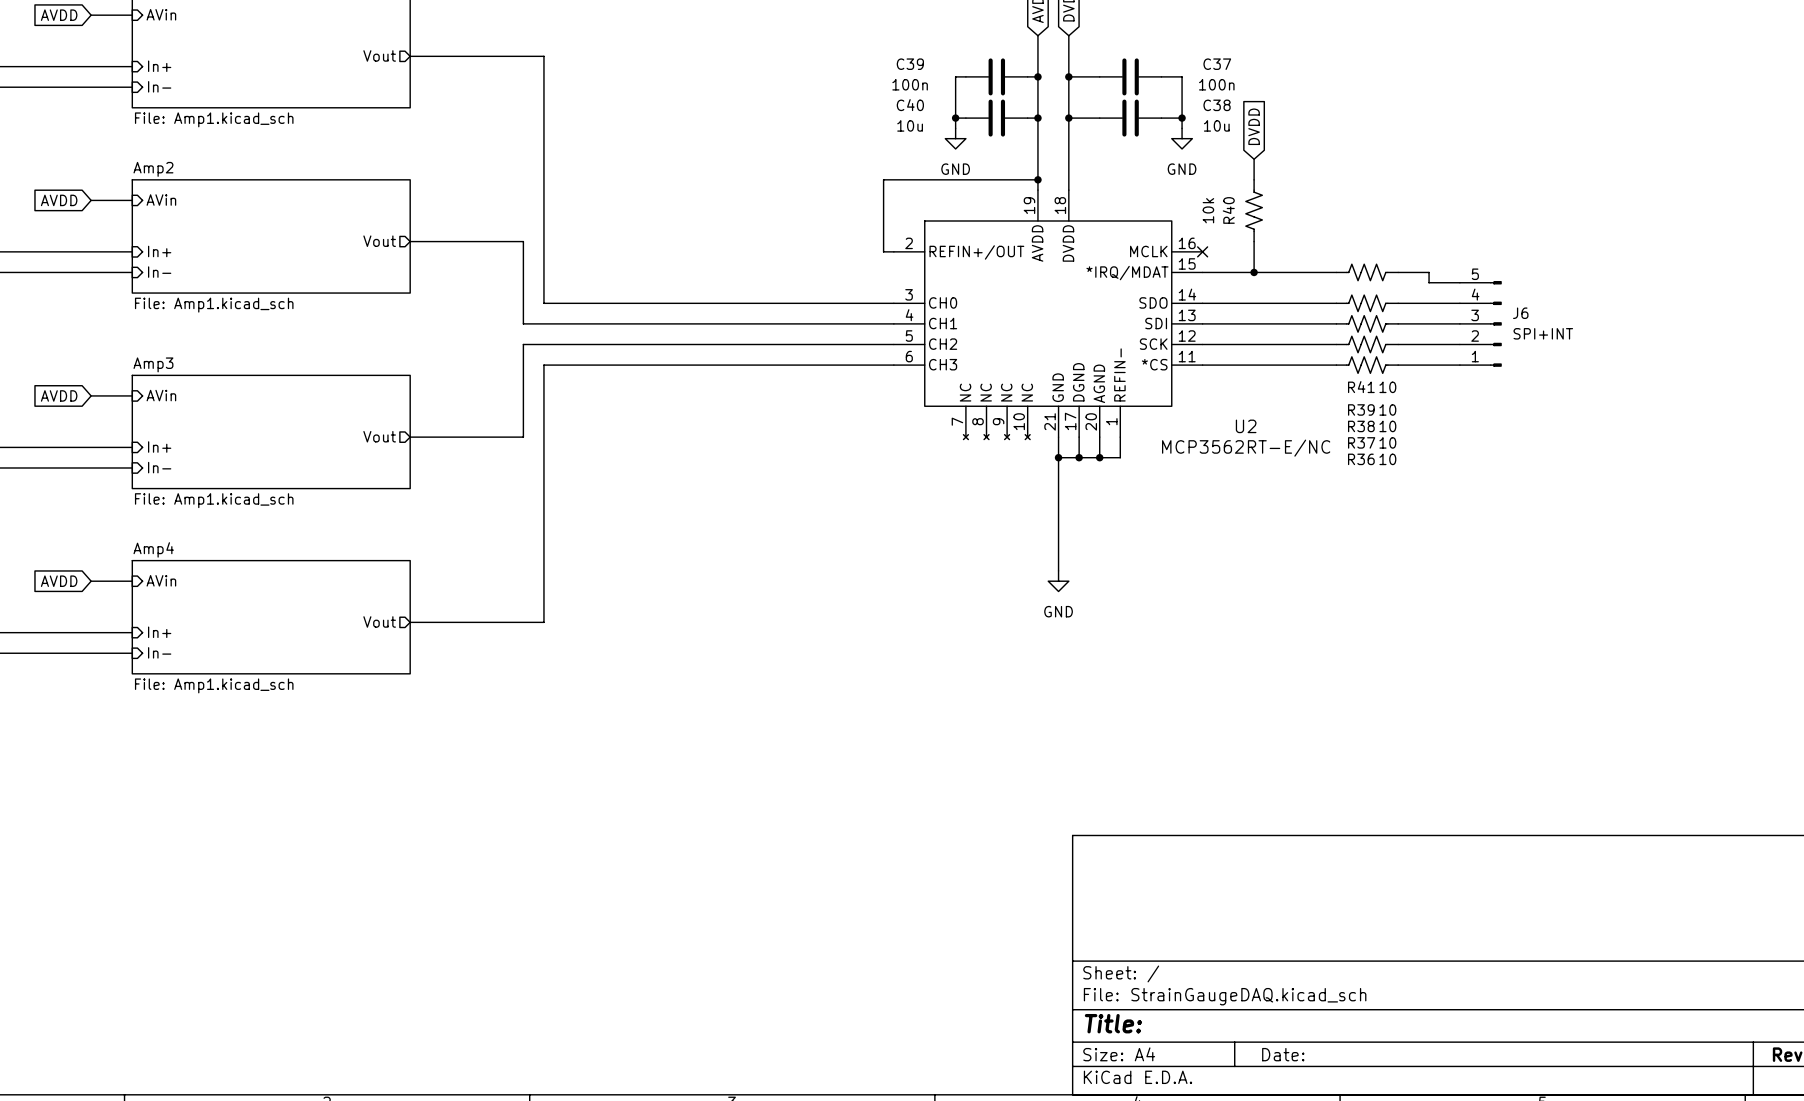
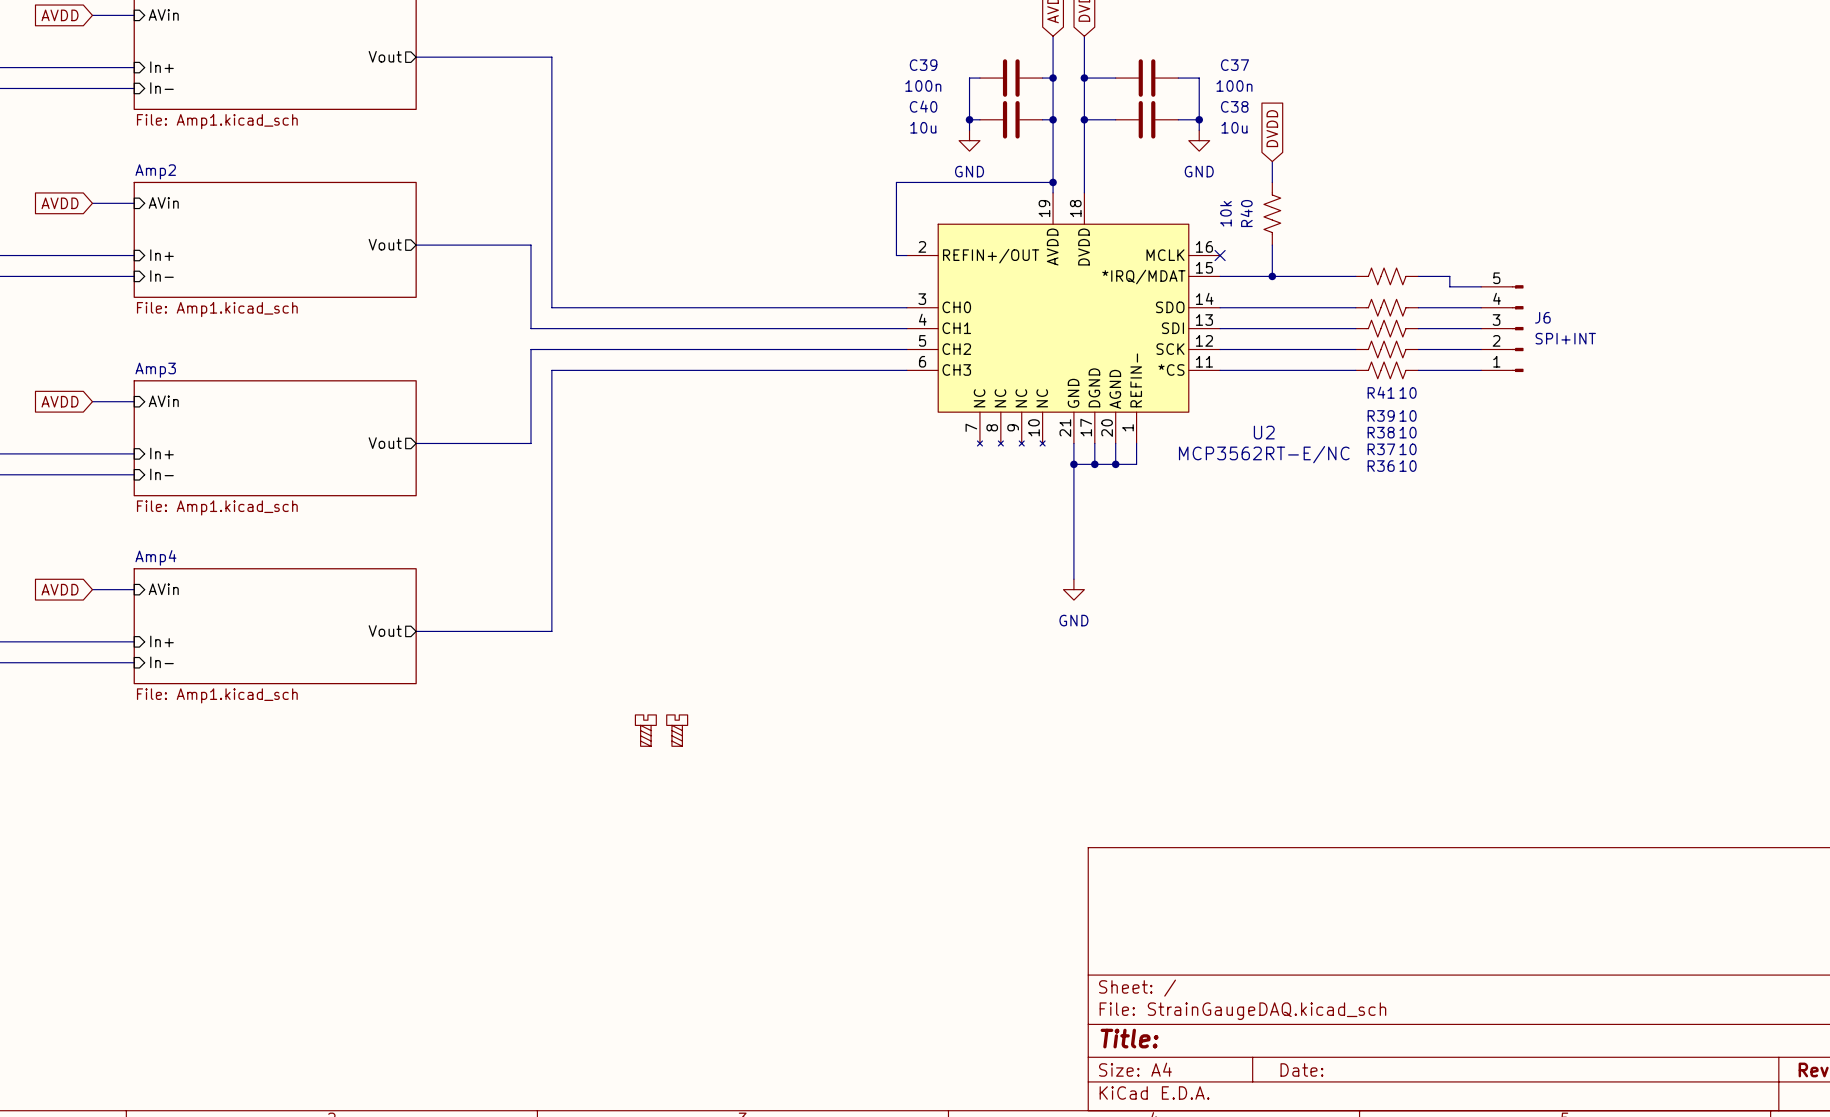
part: none -> (645, 730)
part: none -> (677, 730)

